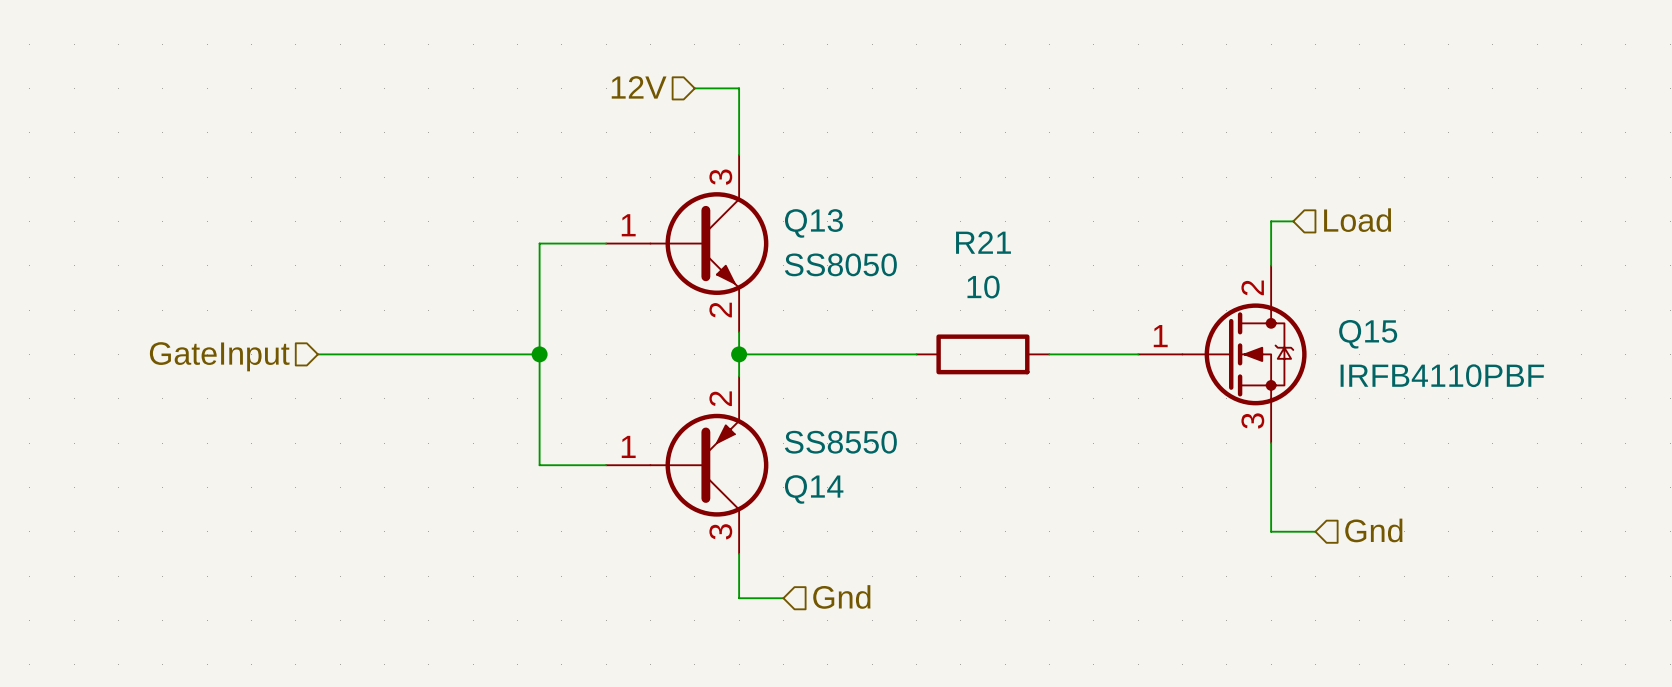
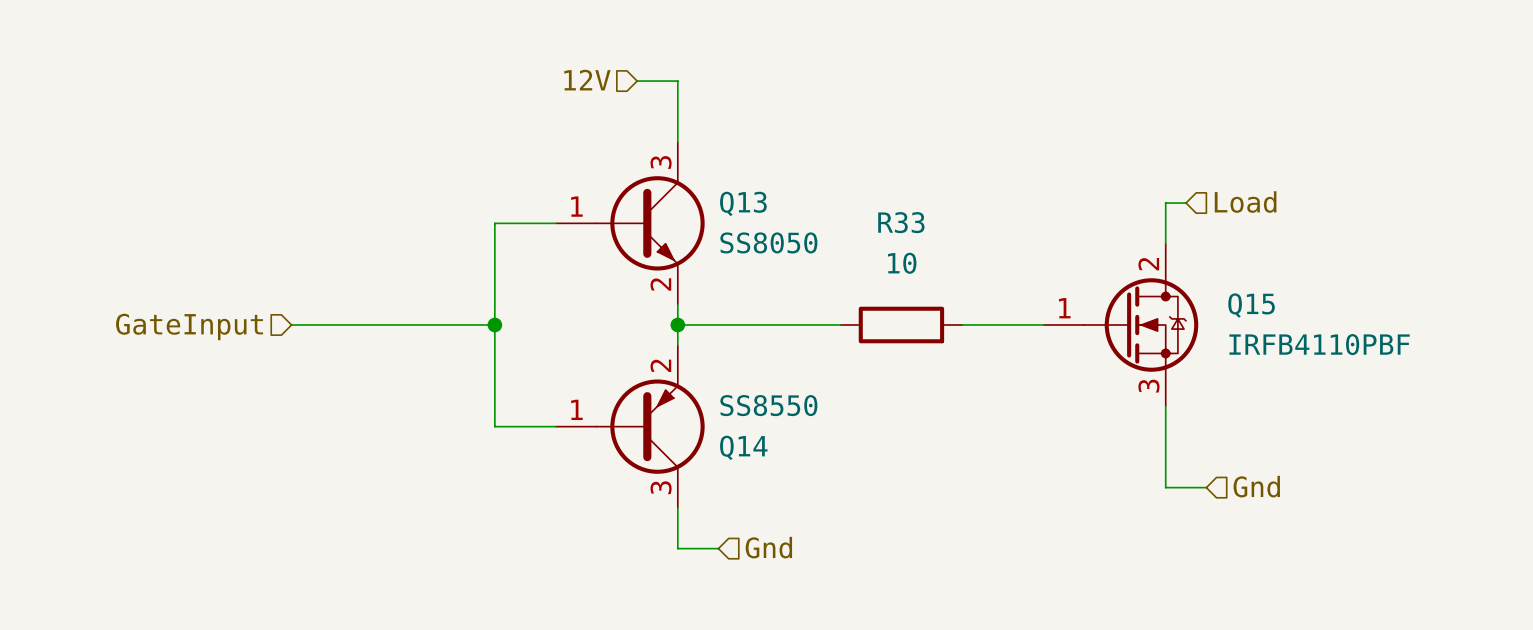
R21 name: R21 (983, 242) -> R33 (901, 222)

